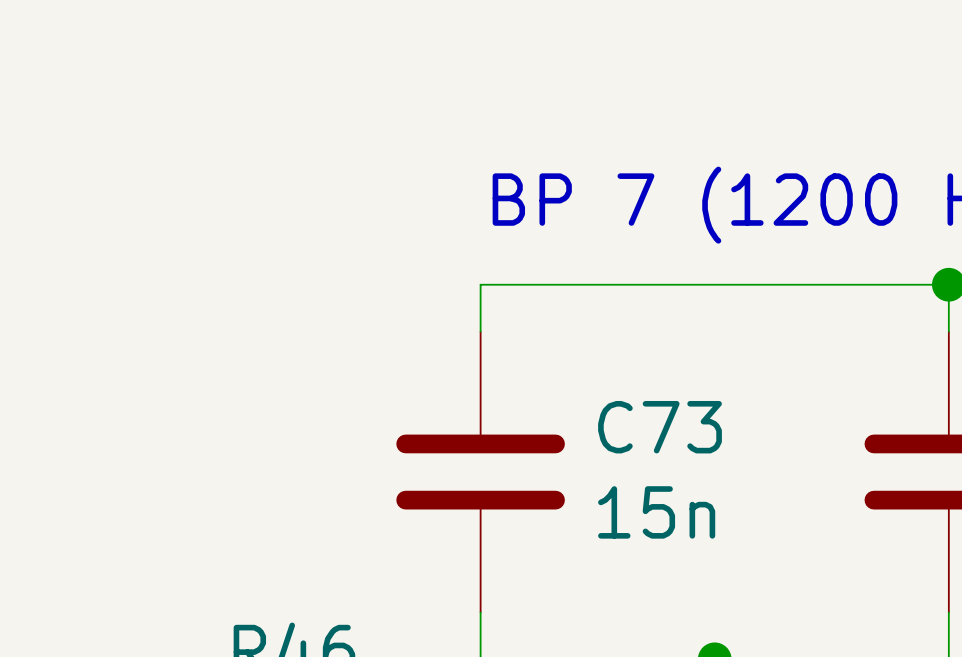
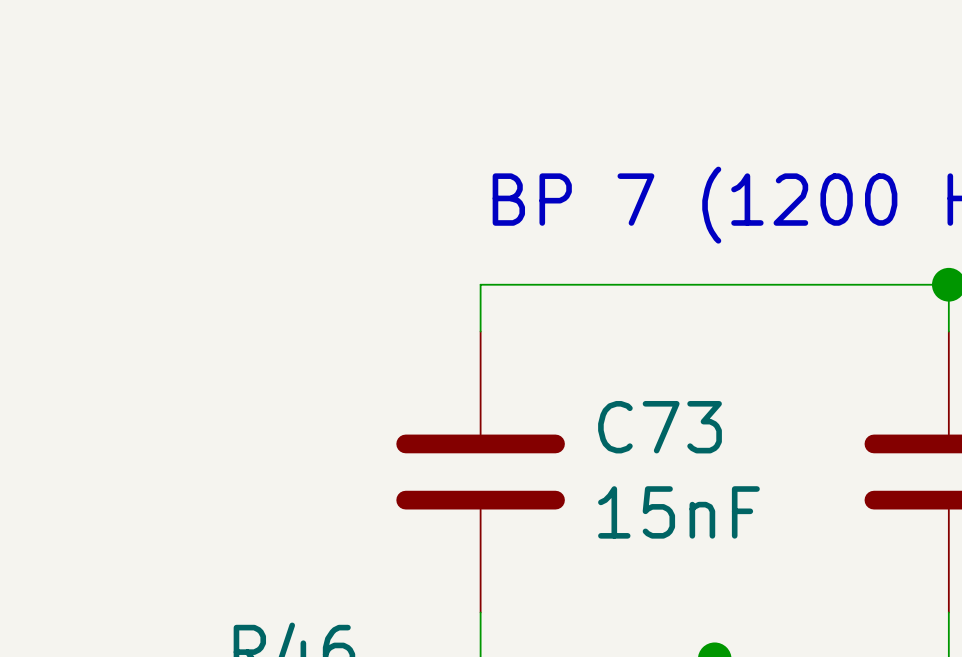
C73 value: 15n (656, 512) -> 15nF (678, 512)

